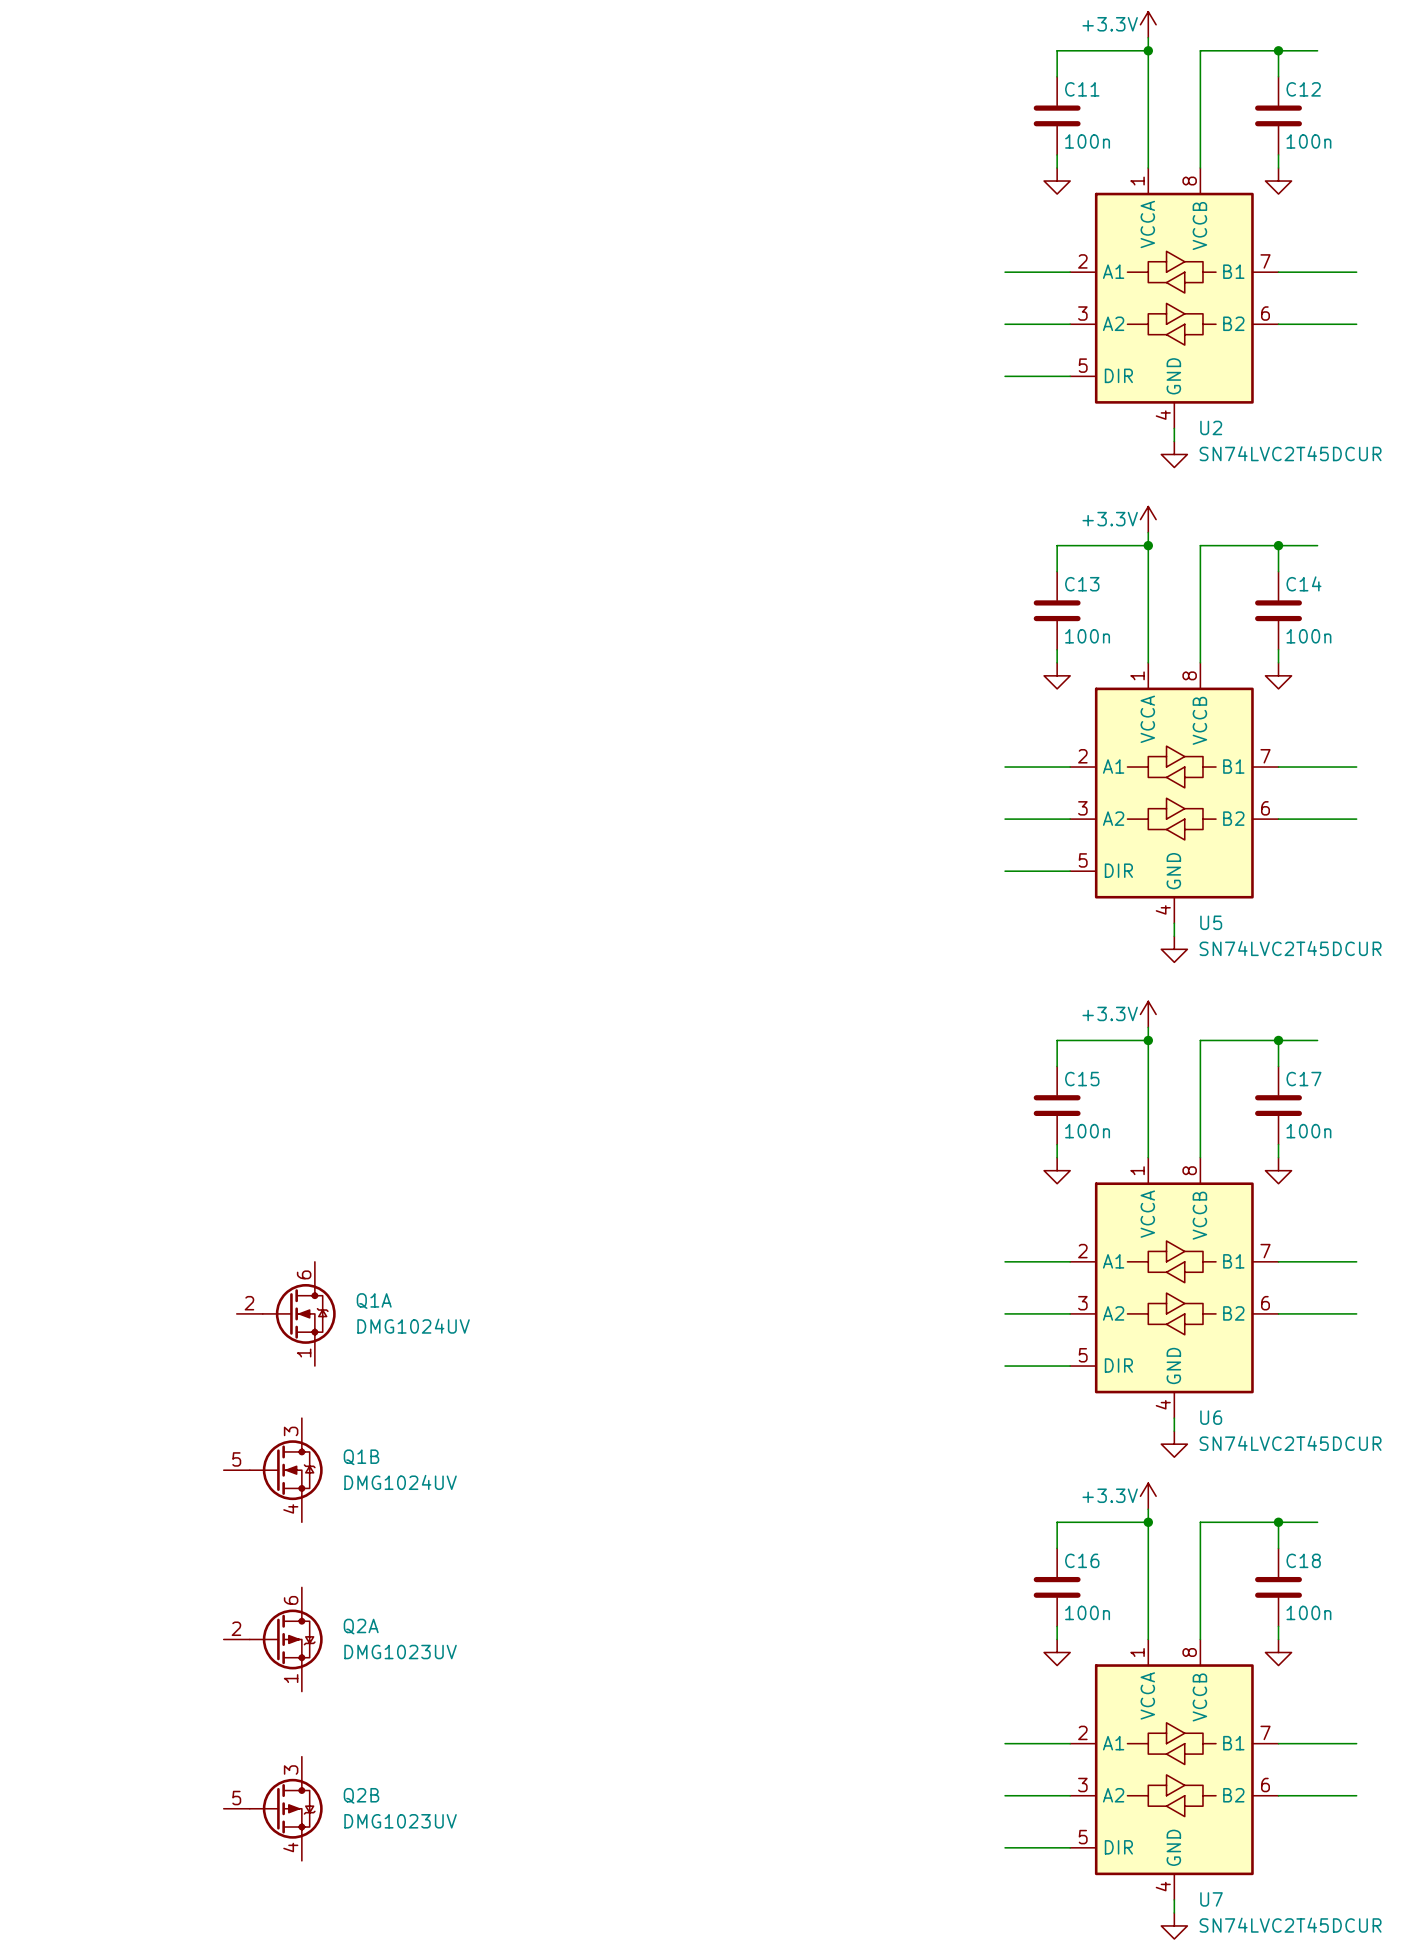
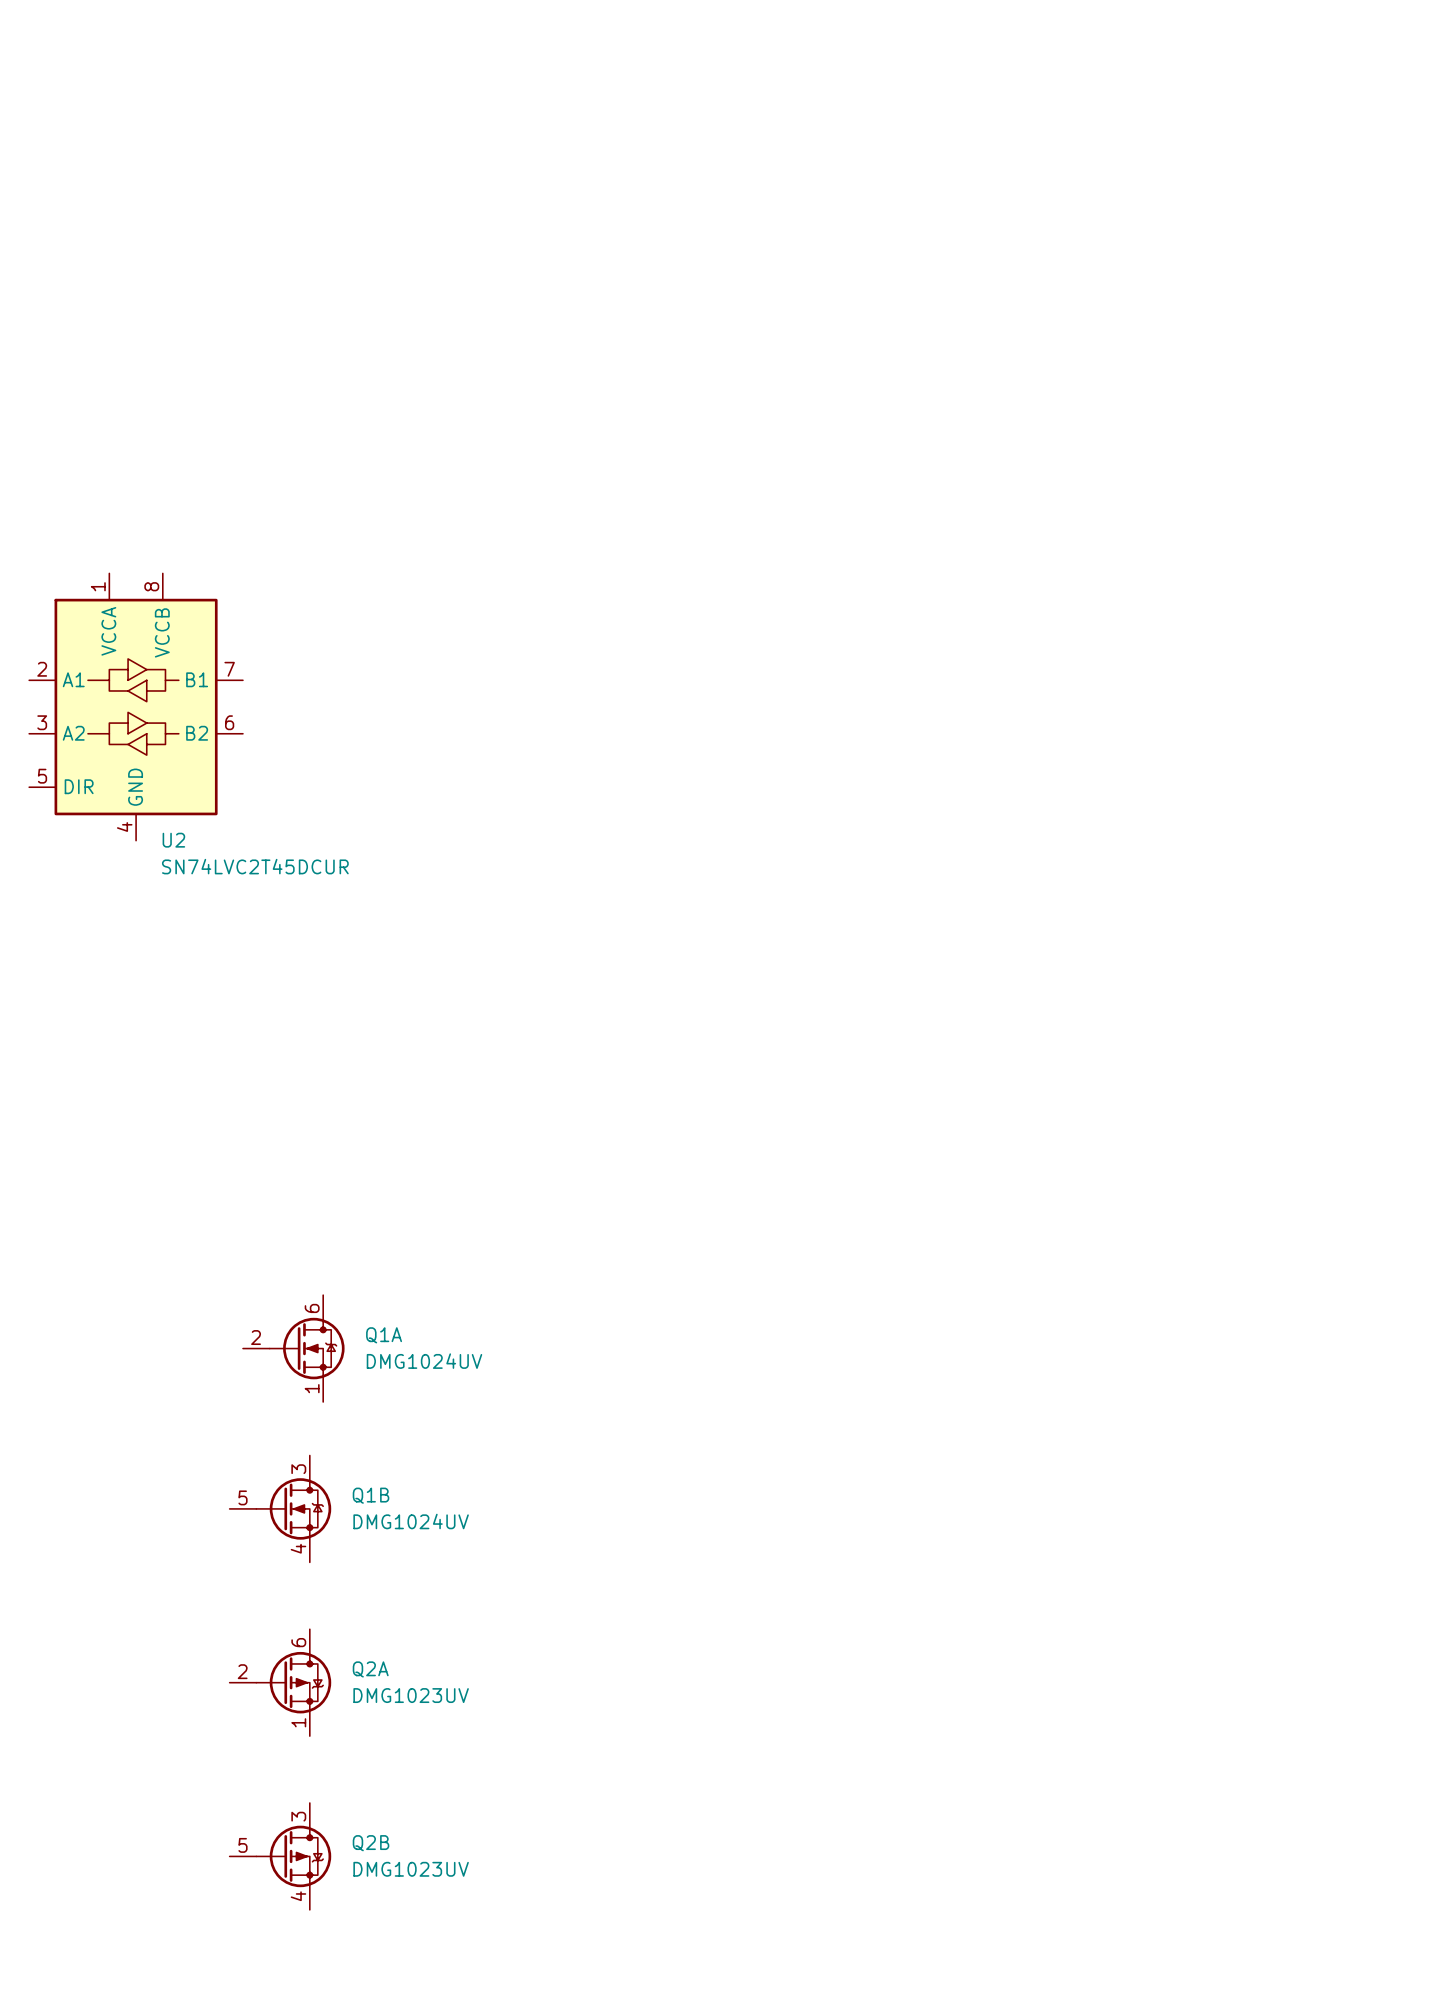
power symbol: +3.3V (1148, 24) -> none
wire: (1148, 37) (1148, 168) -> none
wire: (1148, 50) (1057, 50) (1057, 76) -> none
junction: (1148, 50) -> none
wire: (1278, 50) (1278, 76) -> none
junction: (1278, 50) -> none
wire: (1317, 50) (1200, 50) (1200, 168) -> none
C11: 100n (1057, 115) -> none
C12: 100n (1278, 115) -> none
wire: (1057, 154) (1057, 168) -> none
wire: (1278, 154) (1278, 168) -> none
power symbol: (1057, 181) -> none
power symbol: (1278, 181) -> none
wire: (1005, 272) (1070, 272) -> none
wire: (1278, 272) (1356, 272) -> none
U2 position: (1174, 298) -> (136, 707)
wire: (1005, 324) (1070, 324) -> none
wire: (1278, 324) (1356, 324) -> none
wire: (1005, 376) (1070, 376) -> none
wire: (1174, 428) (1174, 441) -> none
power symbol: (1174, 454) -> none
power symbol: +3.3V (1148, 519) -> none
wire: (1148, 532) (1148, 662) -> none
wire: (1148, 545) (1057, 545) (1057, 571) -> none
junction: (1148, 545) -> none
wire: (1278, 545) (1278, 571) -> none
junction: (1278, 545) -> none
wire: (1317, 545) (1200, 545) (1200, 662) -> none
C13: 100n (1057, 610) -> none
C14: 100n (1278, 610) -> none
wire: (1057, 649) (1057, 662) -> none
wire: (1278, 649) (1278, 662) -> none
power symbol: (1057, 675) -> none
power symbol: (1278, 675) -> none
wire: (1005, 767) (1070, 767) -> none
wire: (1278, 767) (1356, 767) -> none
U5: SN74LVC2T45DCUR (1174, 793) -> none
wire: (1005, 819) (1070, 819) -> none
wire: (1278, 819) (1356, 819) -> none
wire: (1005, 871) (1070, 871) -> none
wire: (1174, 923) (1174, 936) -> none
power symbol: (1174, 949) -> none
power symbol: +3.3V (1148, 1014) -> none
wire: (1148, 1027) (1148, 1157) -> none
wire: (1148, 1040) (1057, 1040) (1057, 1066) -> none
junction: (1148, 1040) -> none
wire: (1278, 1040) (1278, 1066) -> none
junction: (1278, 1040) -> none
wire: (1317, 1040) (1200, 1040) (1200, 1157) -> none
C15: 100n (1057, 1105) -> none
C17: 100n (1278, 1105) -> none
wire: (1057, 1144) (1057, 1157) -> none
wire: (1278, 1144) (1278, 1157) -> none
power symbol: (1057, 1170) -> none
power symbol: (1278, 1170) -> none
wire: (1005, 1261) (1070, 1261) -> none
wire: (1278, 1261) (1356, 1261) -> none
U6: SN74LVC2T45DCUR (1174, 1287) -> none
wire: (1005, 1313) (1070, 1313) -> none
wire: (1278, 1313) (1356, 1313) -> none
wire: (1005, 1366) (1070, 1366) -> none
wire: (1174, 1418) (1174, 1431) -> none
power symbol: (1174, 1444) -> none
power symbol: +3.3V (1148, 1496) -> none
wire: (1148, 1509) (1148, 1639) -> none
wire: (1148, 1522) (1057, 1522) (1057, 1548) -> none
junction: (1148, 1522) -> none
wire: (1278, 1522) (1278, 1548) -> none
junction: (1278, 1522) -> none
wire: (1317, 1522) (1200, 1522) (1200, 1639) -> none
C16: 100n (1057, 1587) -> none
C18: 100n (1278, 1587) -> none
wire: (1057, 1626) (1057, 1639) -> none
wire: (1278, 1626) (1278, 1639) -> none
power symbol: (1057, 1652) -> none
power symbol: (1278, 1652) -> none
wire: (1005, 1743) (1070, 1743) -> none
wire: (1278, 1743) (1356, 1743) -> none
U7: SN74LVC2T45DCUR (1174, 1769) -> none
wire: (1005, 1795) (1070, 1795) -> none
wire: (1278, 1795) (1356, 1795) -> none
wire: (1005, 1847) (1070, 1847) -> none
wire: (1174, 1899) (1174, 1912) -> none
power symbol: (1174, 1925) -> none

